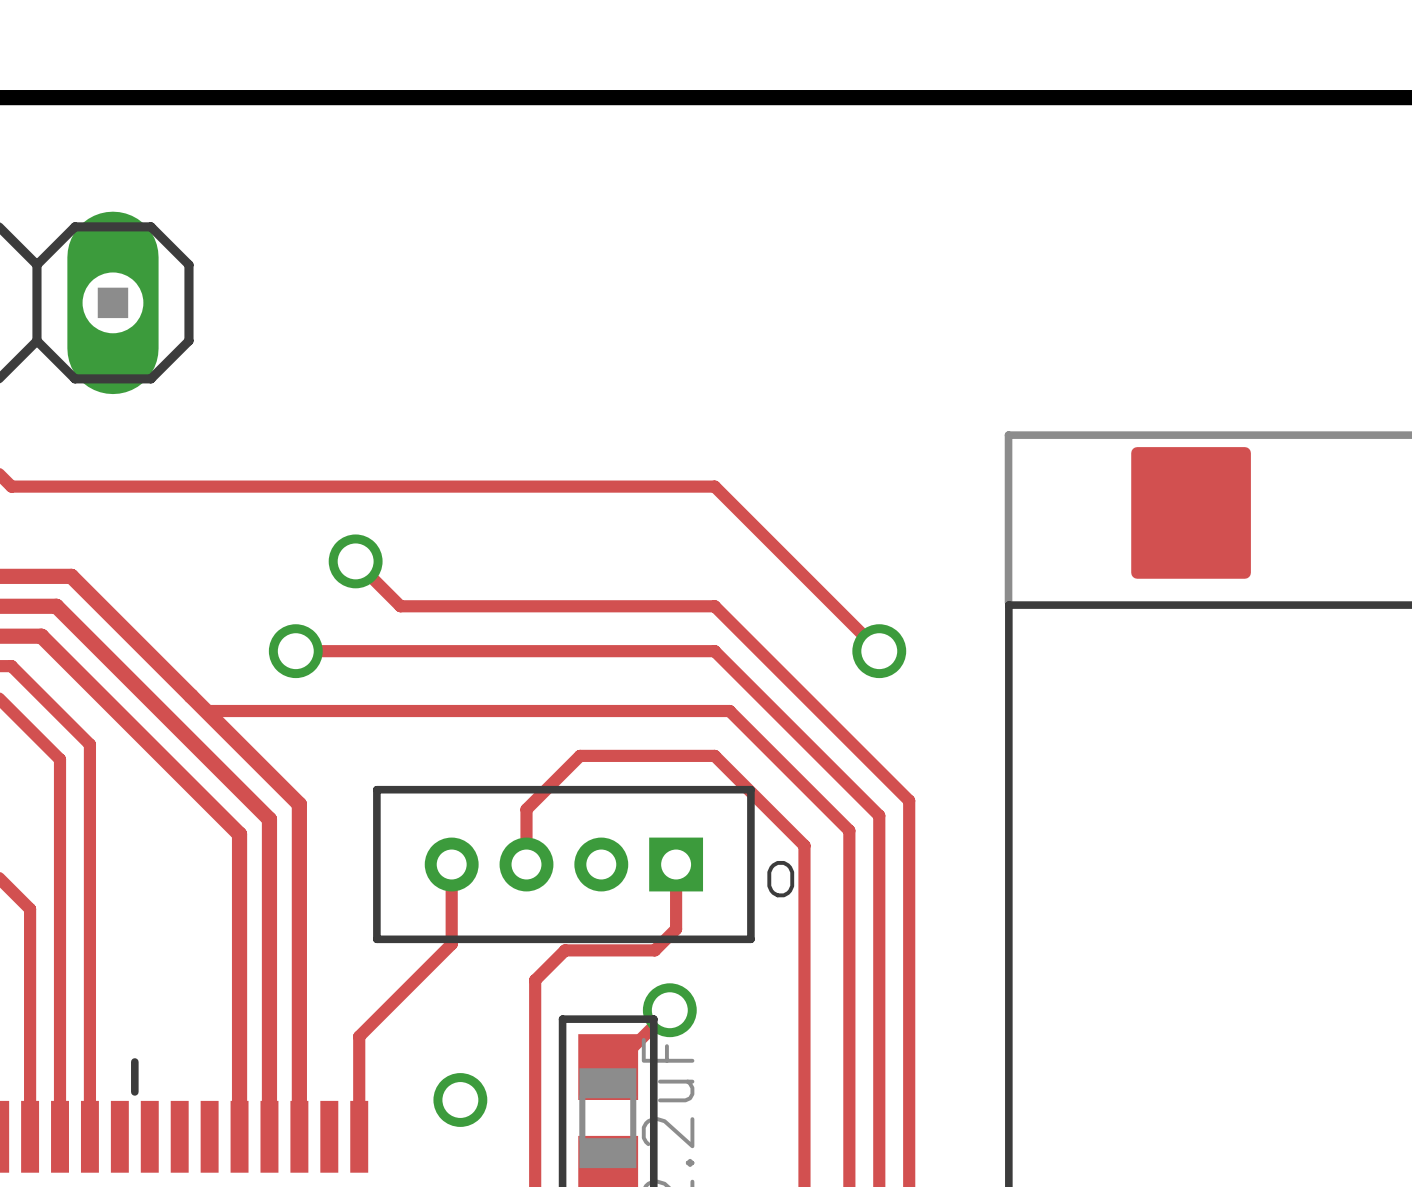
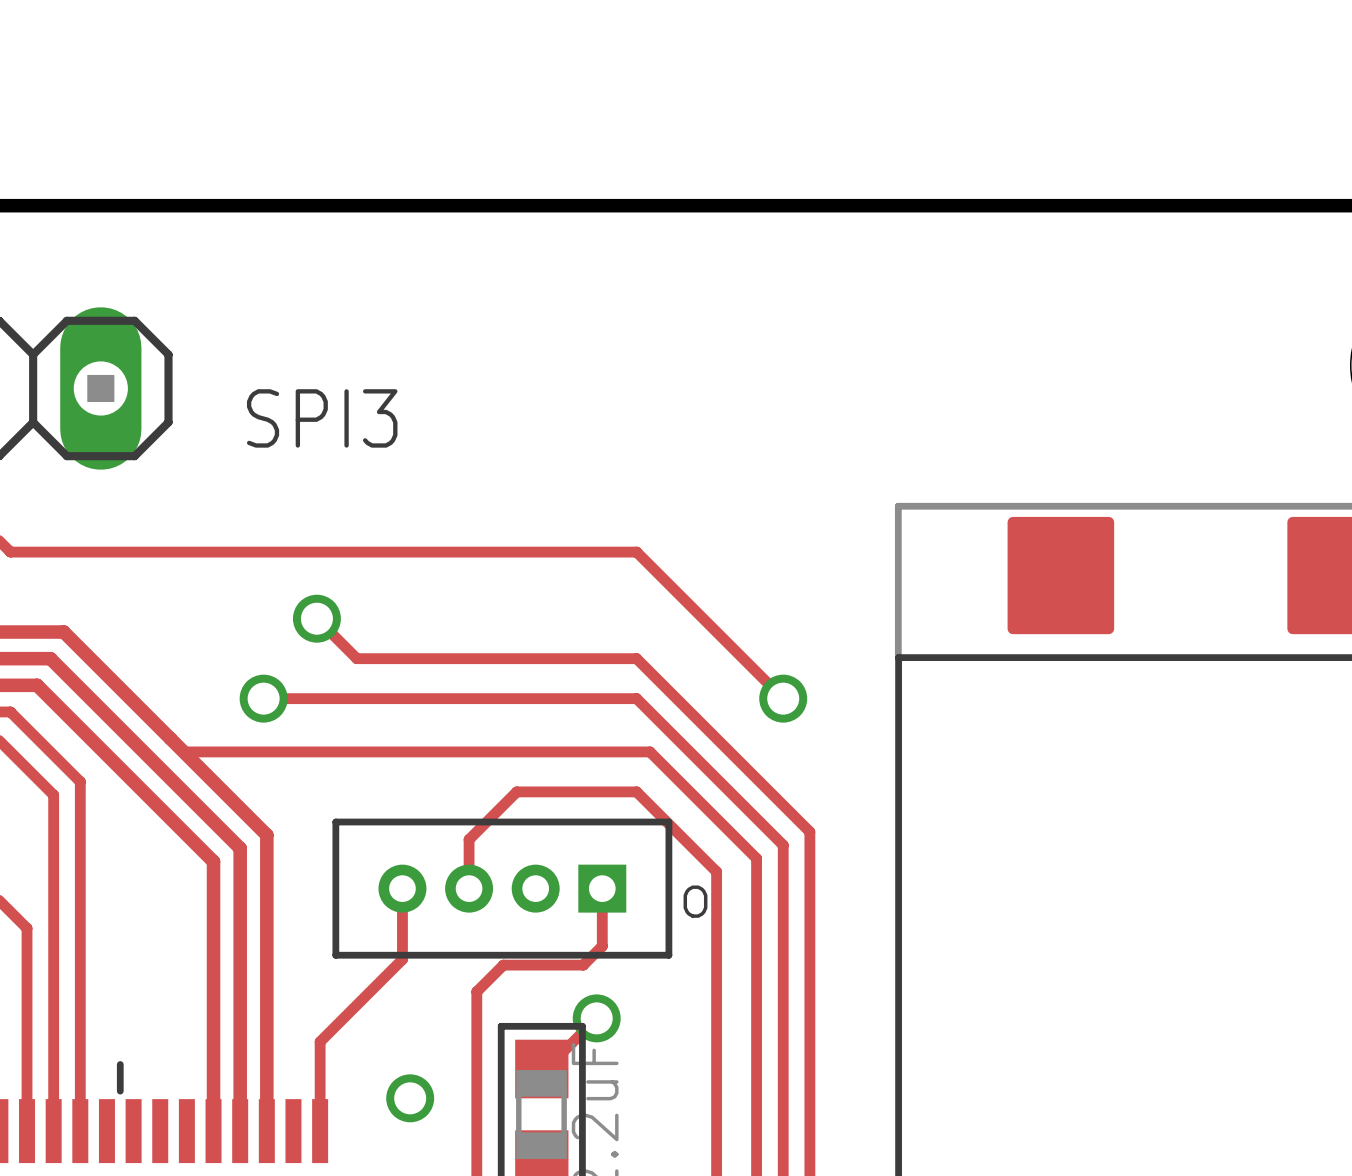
text: none -> SPI3 (322, 418)

